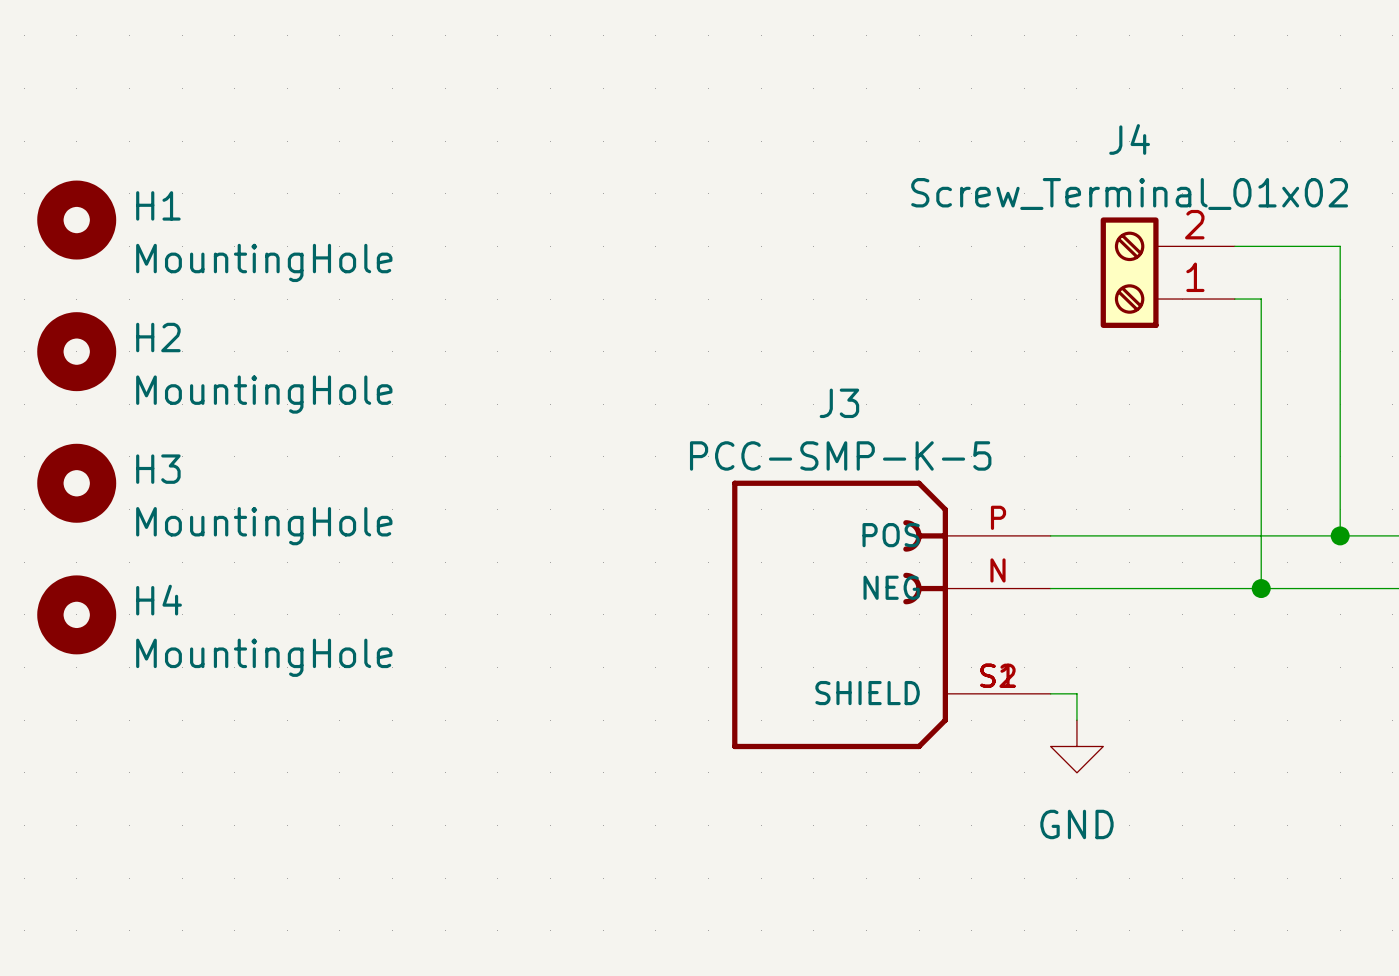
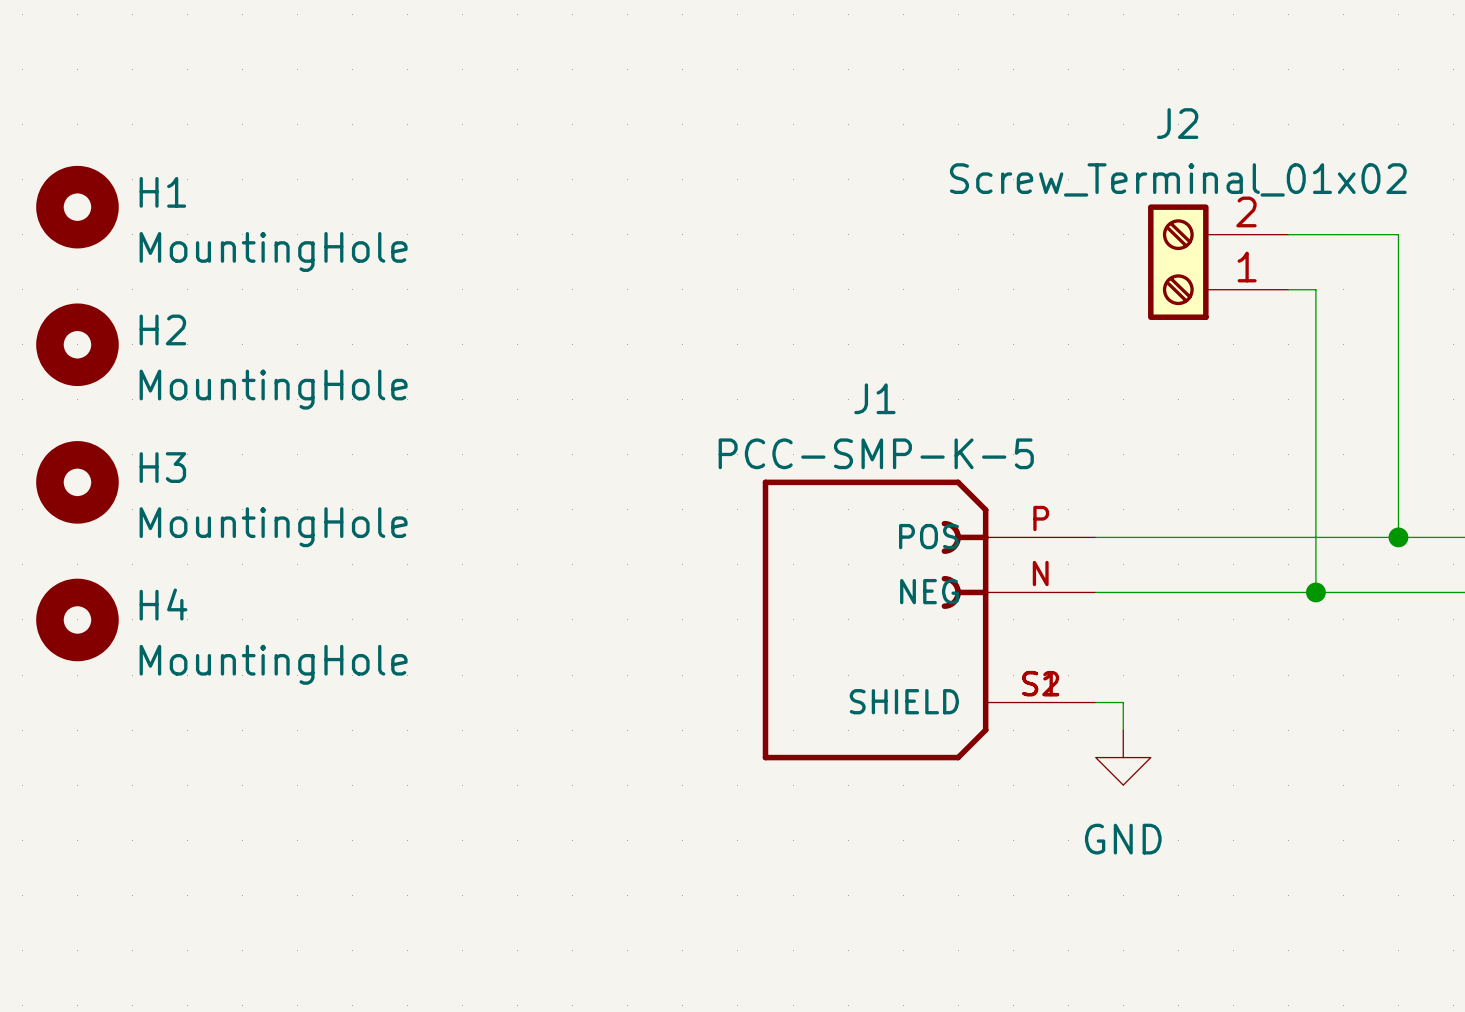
J4 name: J4 (1129, 139) -> J2 (1177, 123)
J3 name: J3 (839, 403) -> J1 (874, 398)

